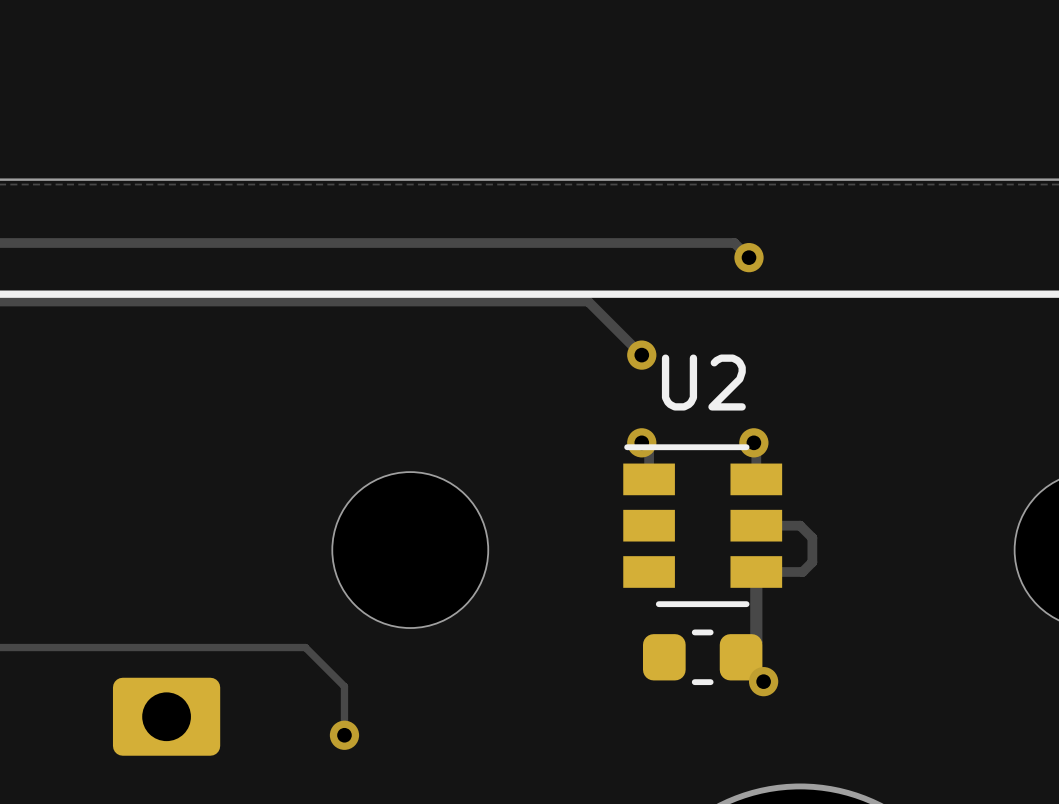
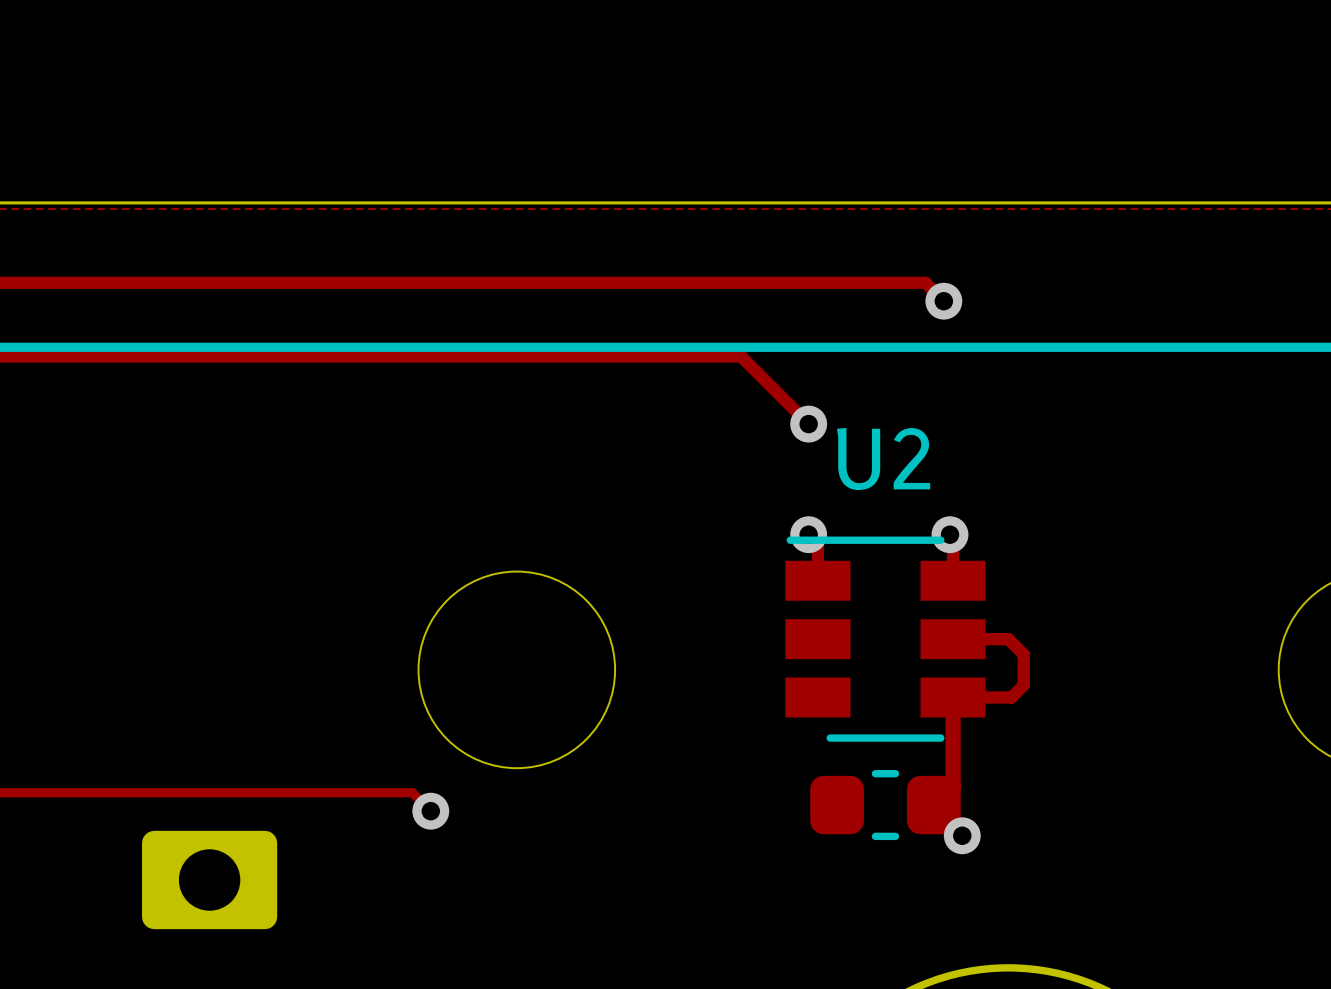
track: (305, 647) (344, 686) (344, 735) -> (384, 792) (412, 792) (430, 811)
via position: (344, 735) -> (430, 811)

